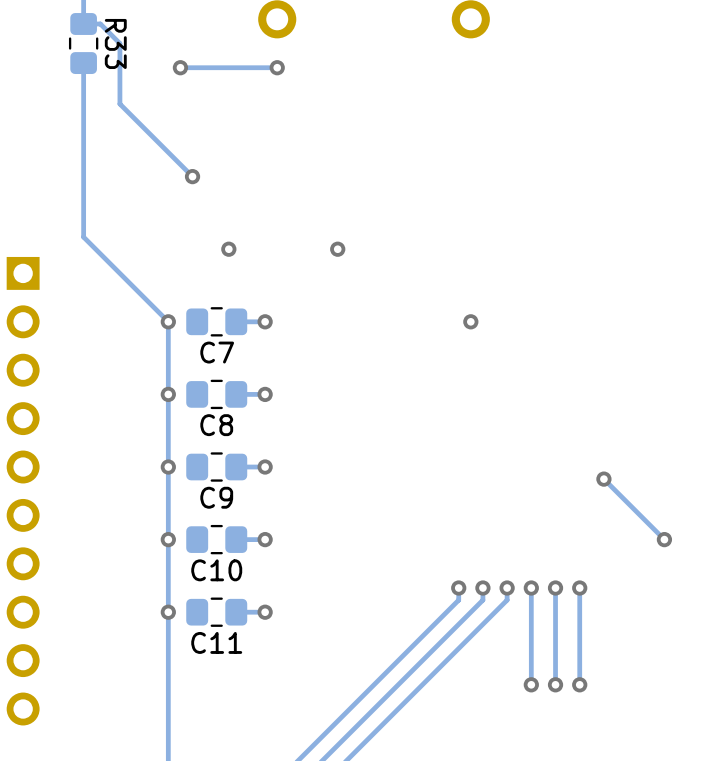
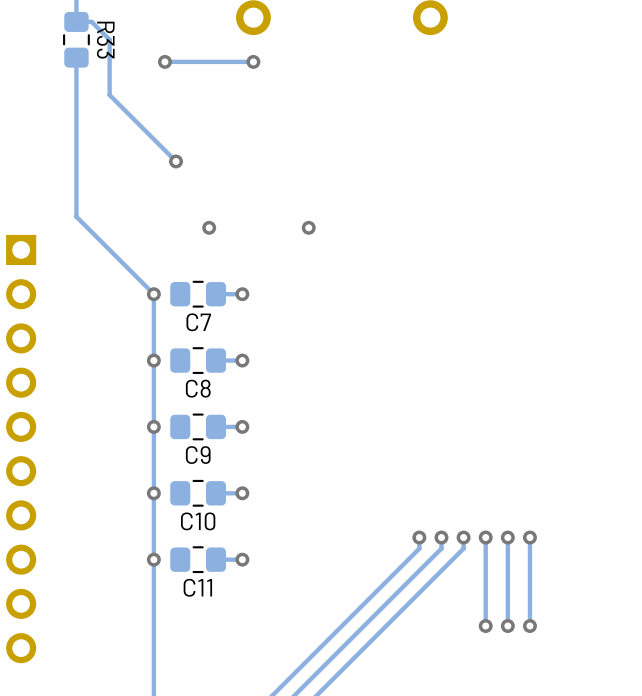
via: (470, 321) -> none
track: (603, 479) (664, 539) -> none
via: (603, 479) -> none
via: (664, 539) -> none

